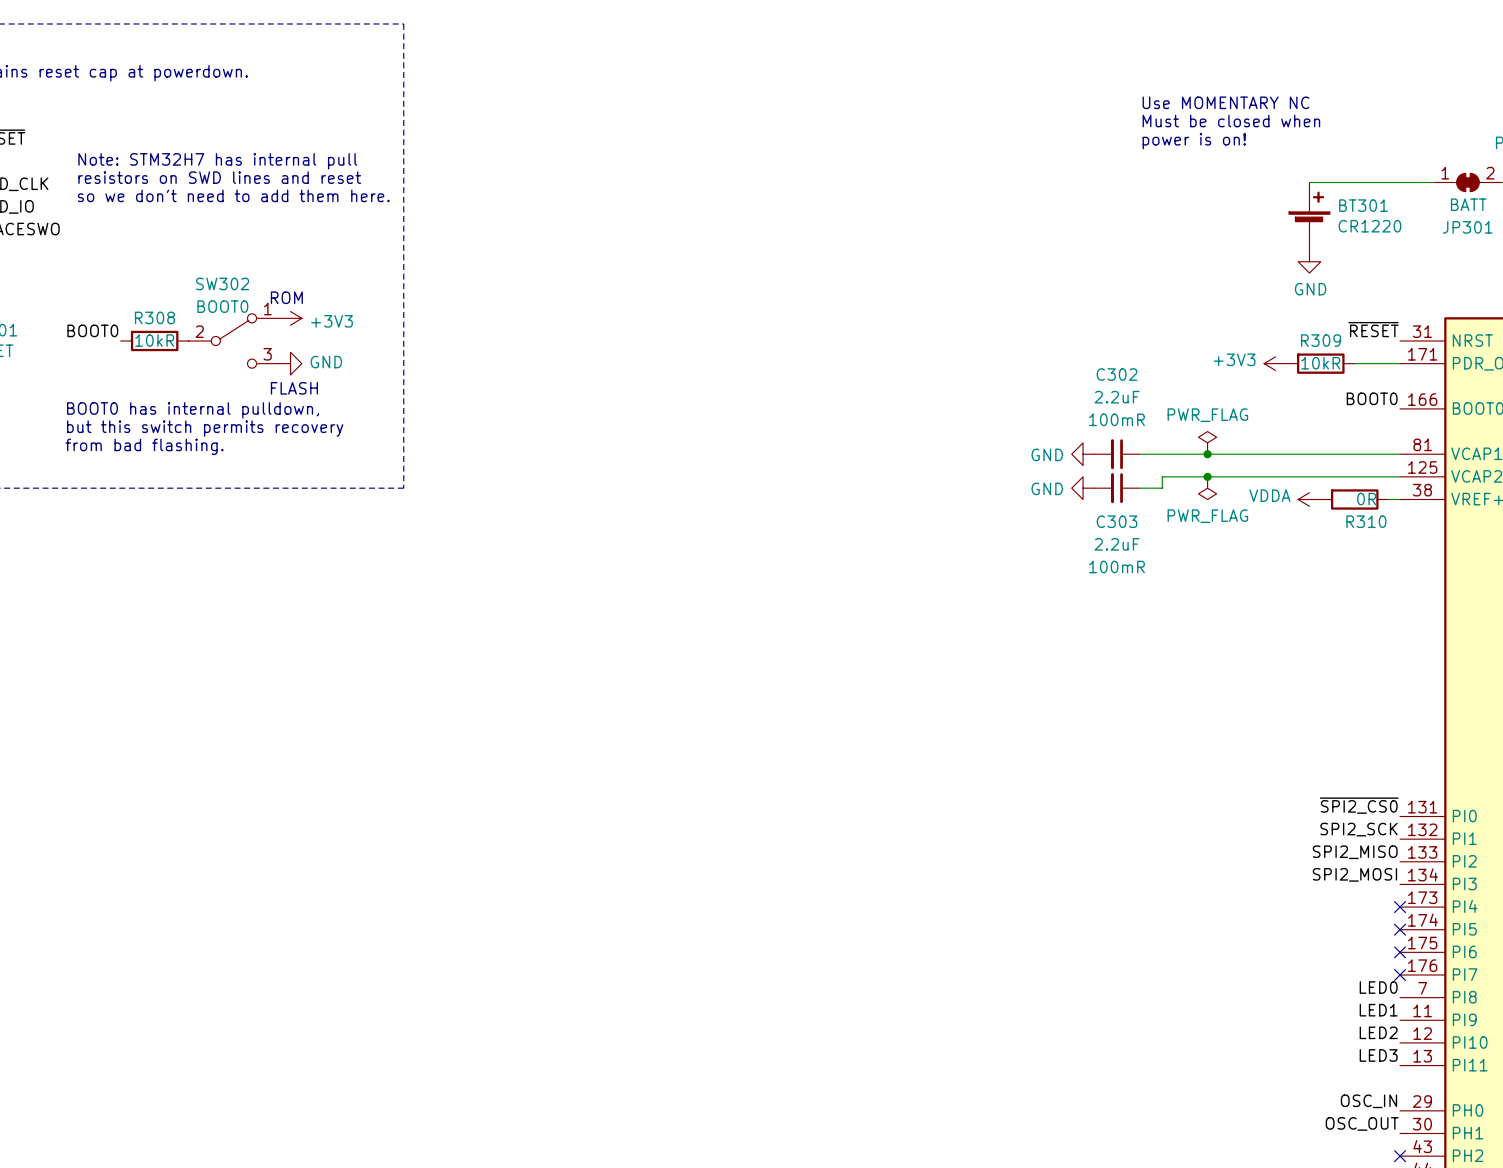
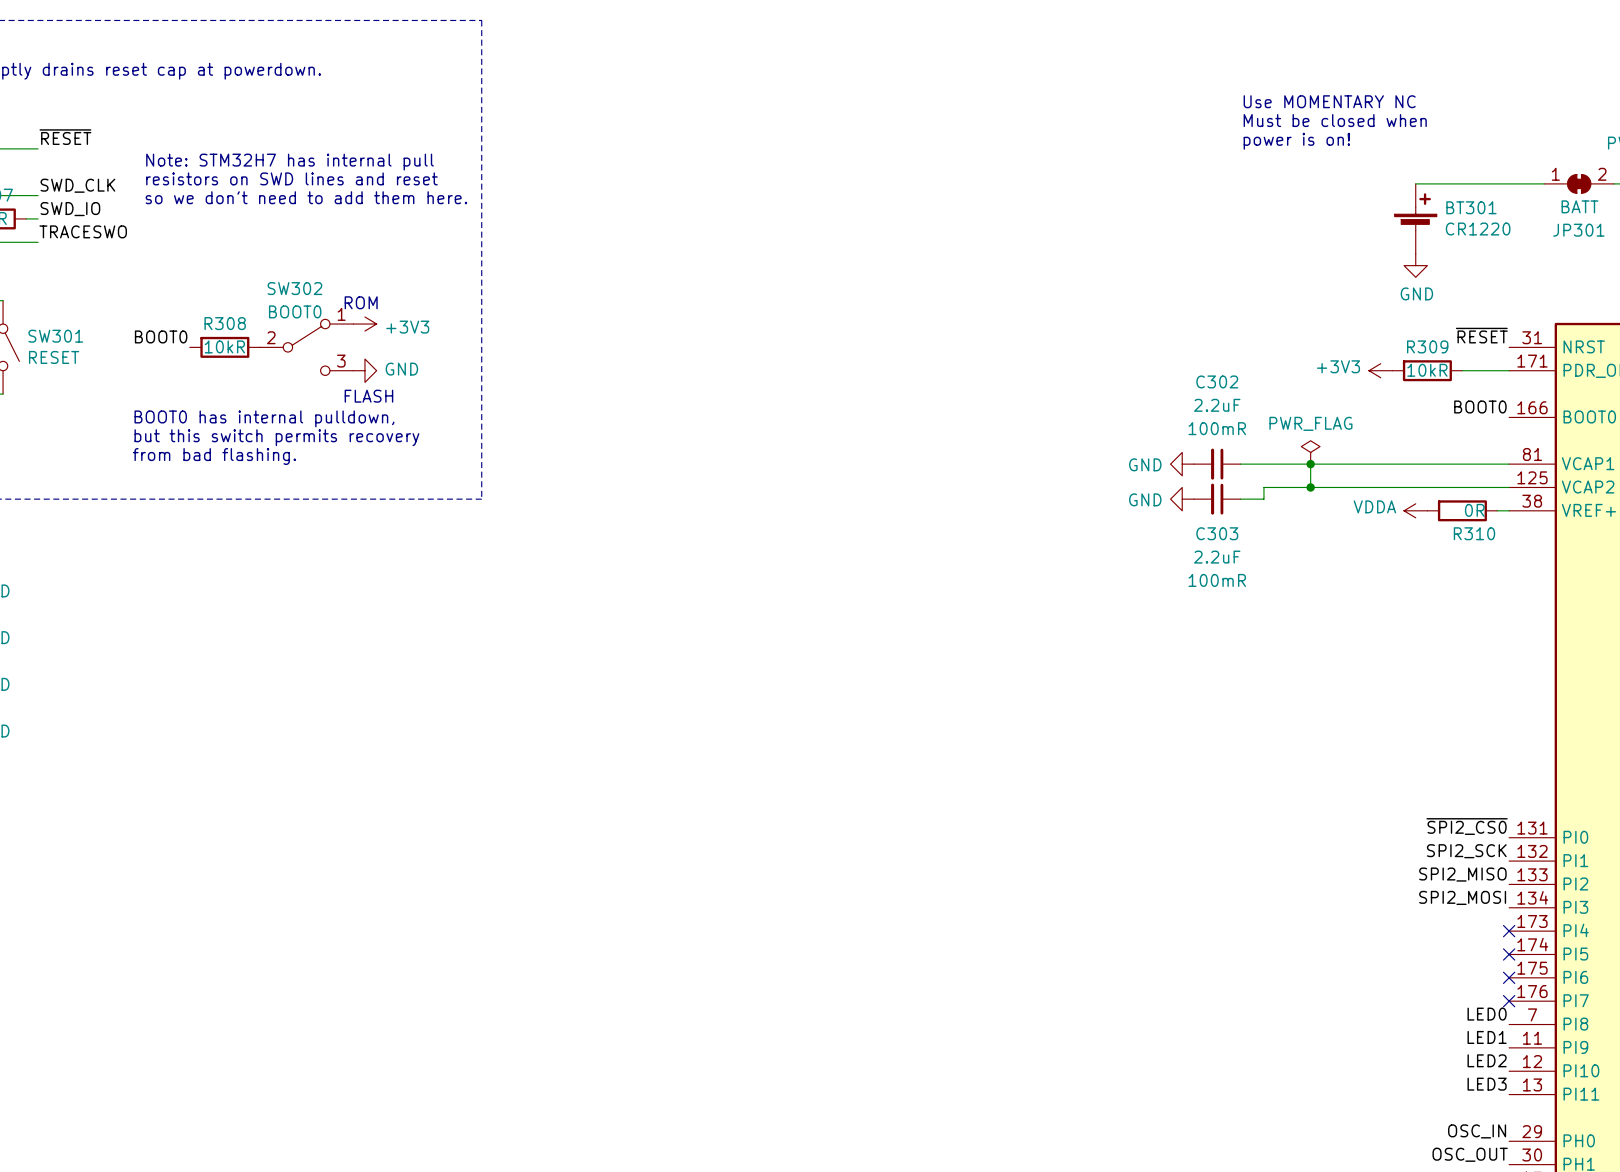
wire: none -> (1310, 464) (1310, 487)
power symbol: PWR_FLAG (1207, 488) -> none

